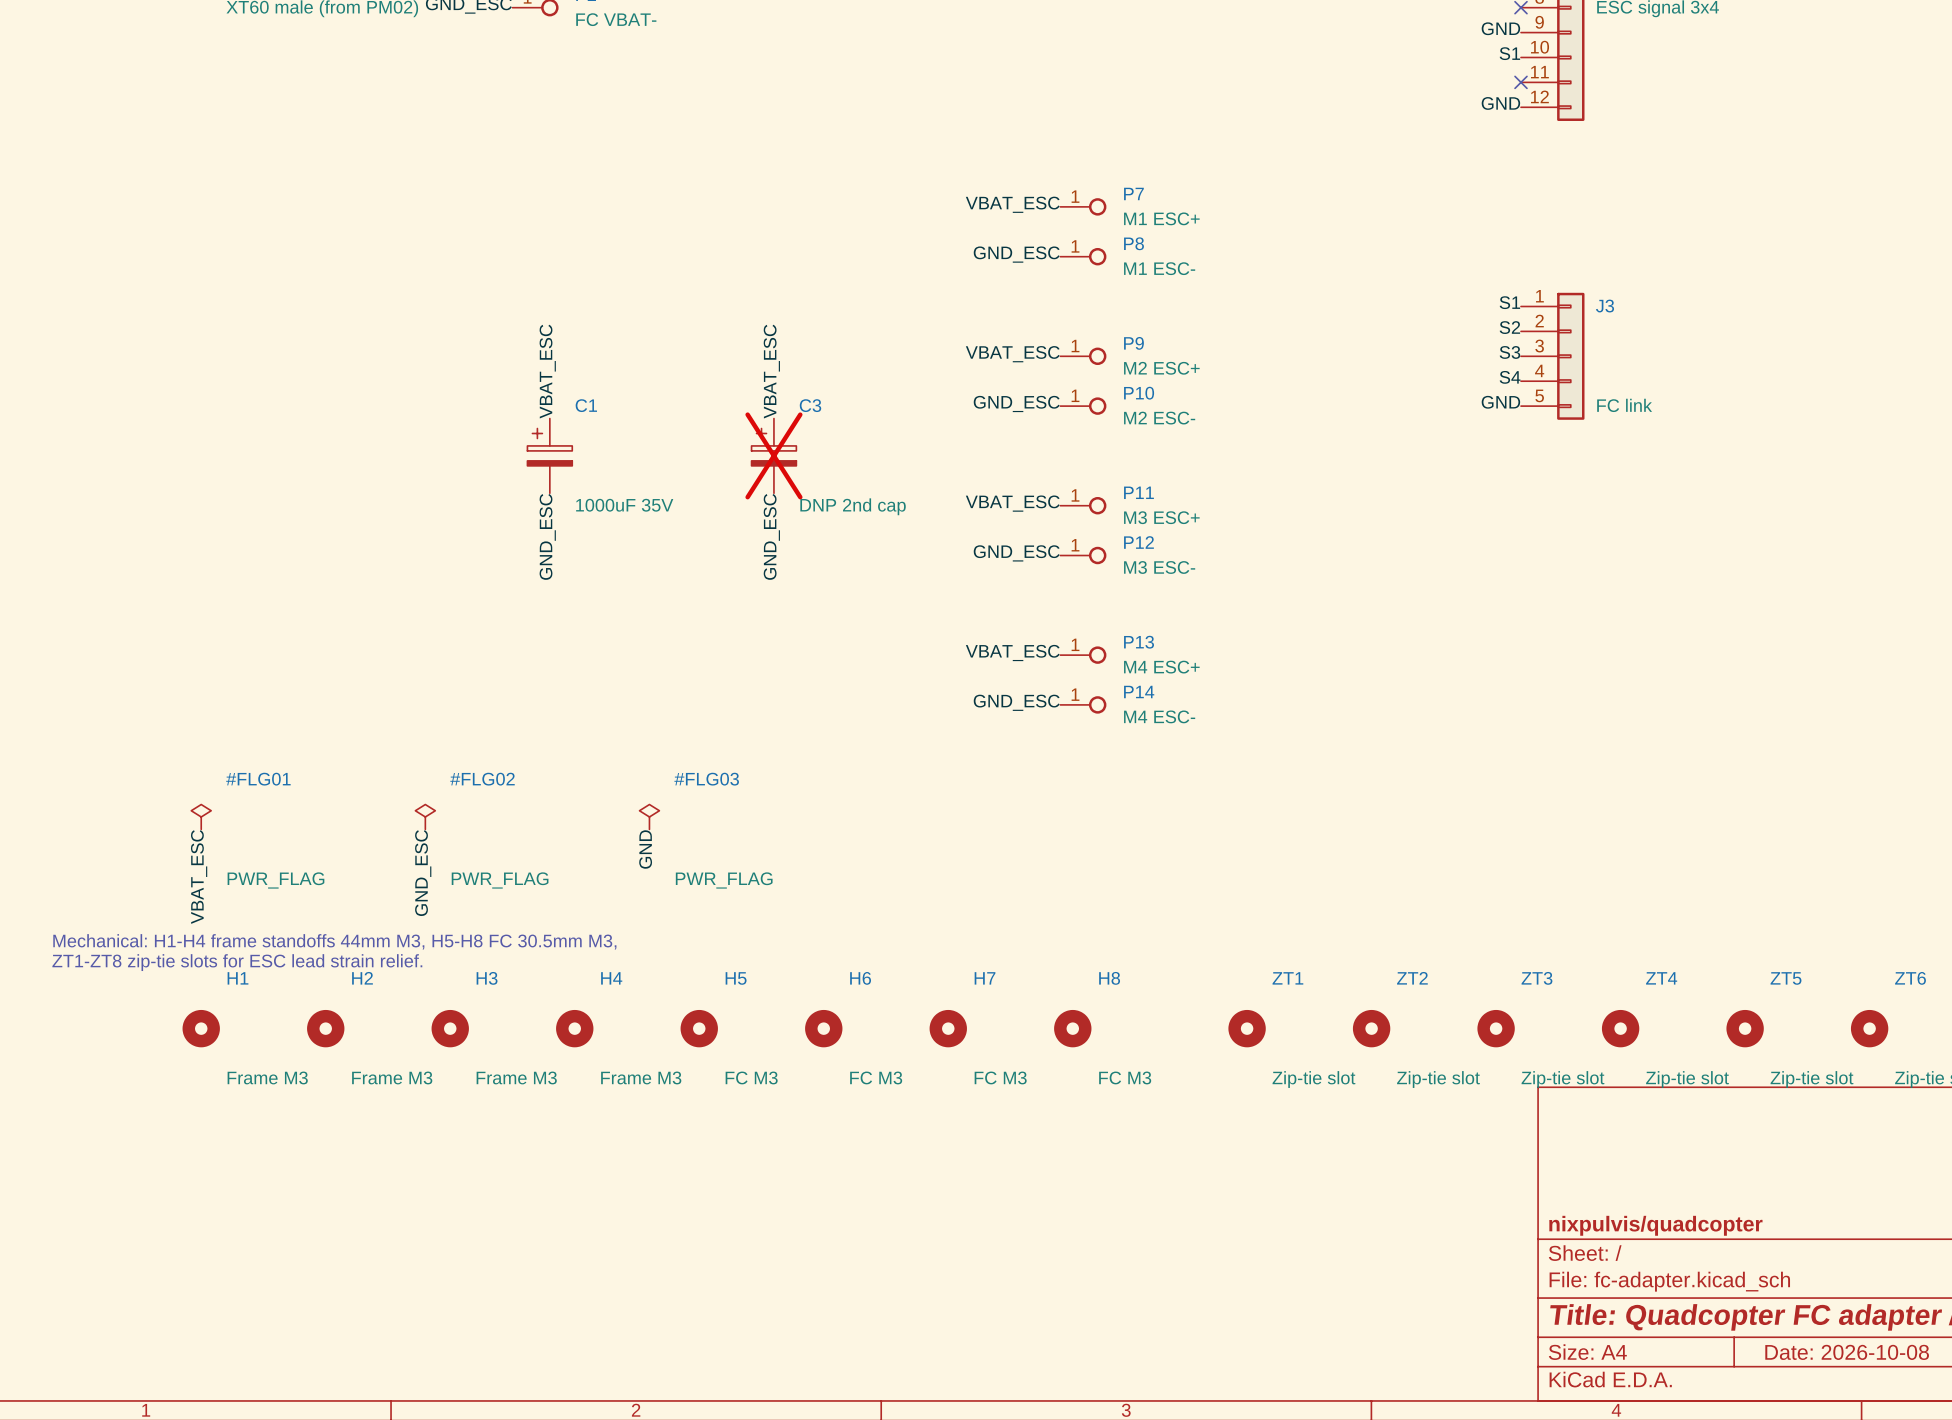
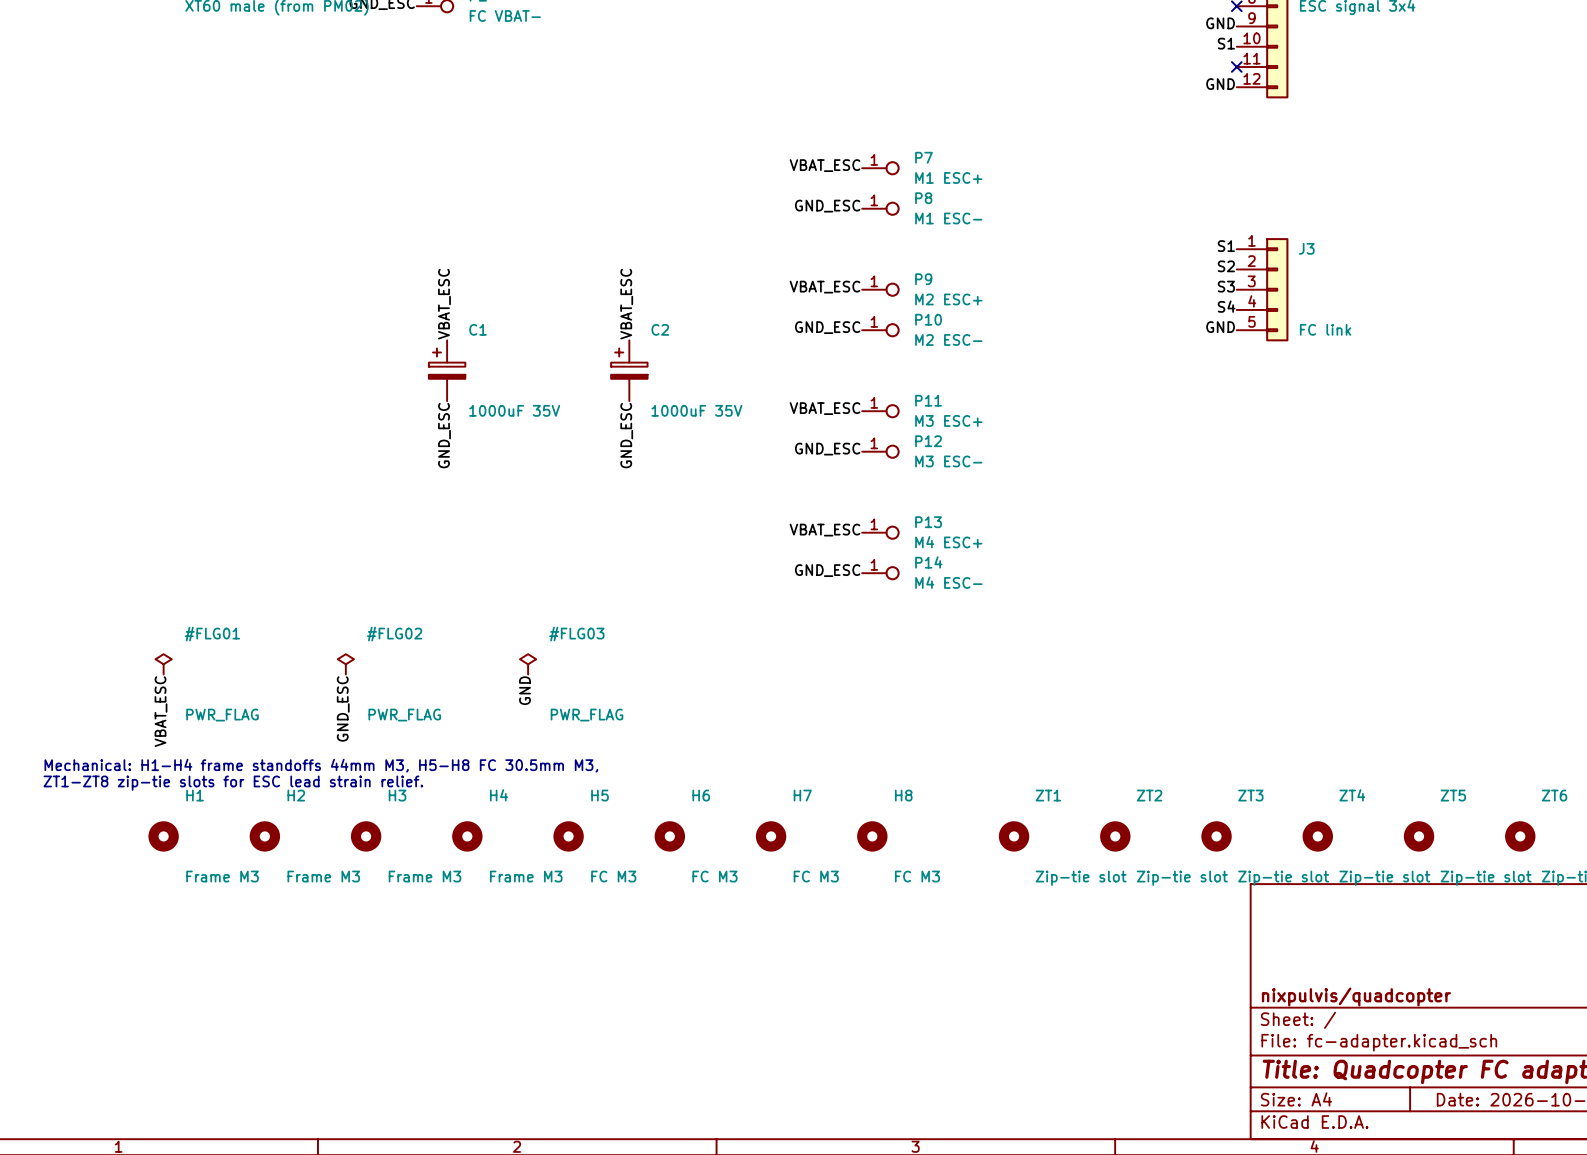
C3 name: C3 (810, 405) -> C2 (660, 329)
C3 do-not-place cross: (773, 455) -> none
C3 value: DNP 2nd cap (853, 506) -> 1000uF 35V (696, 410)

